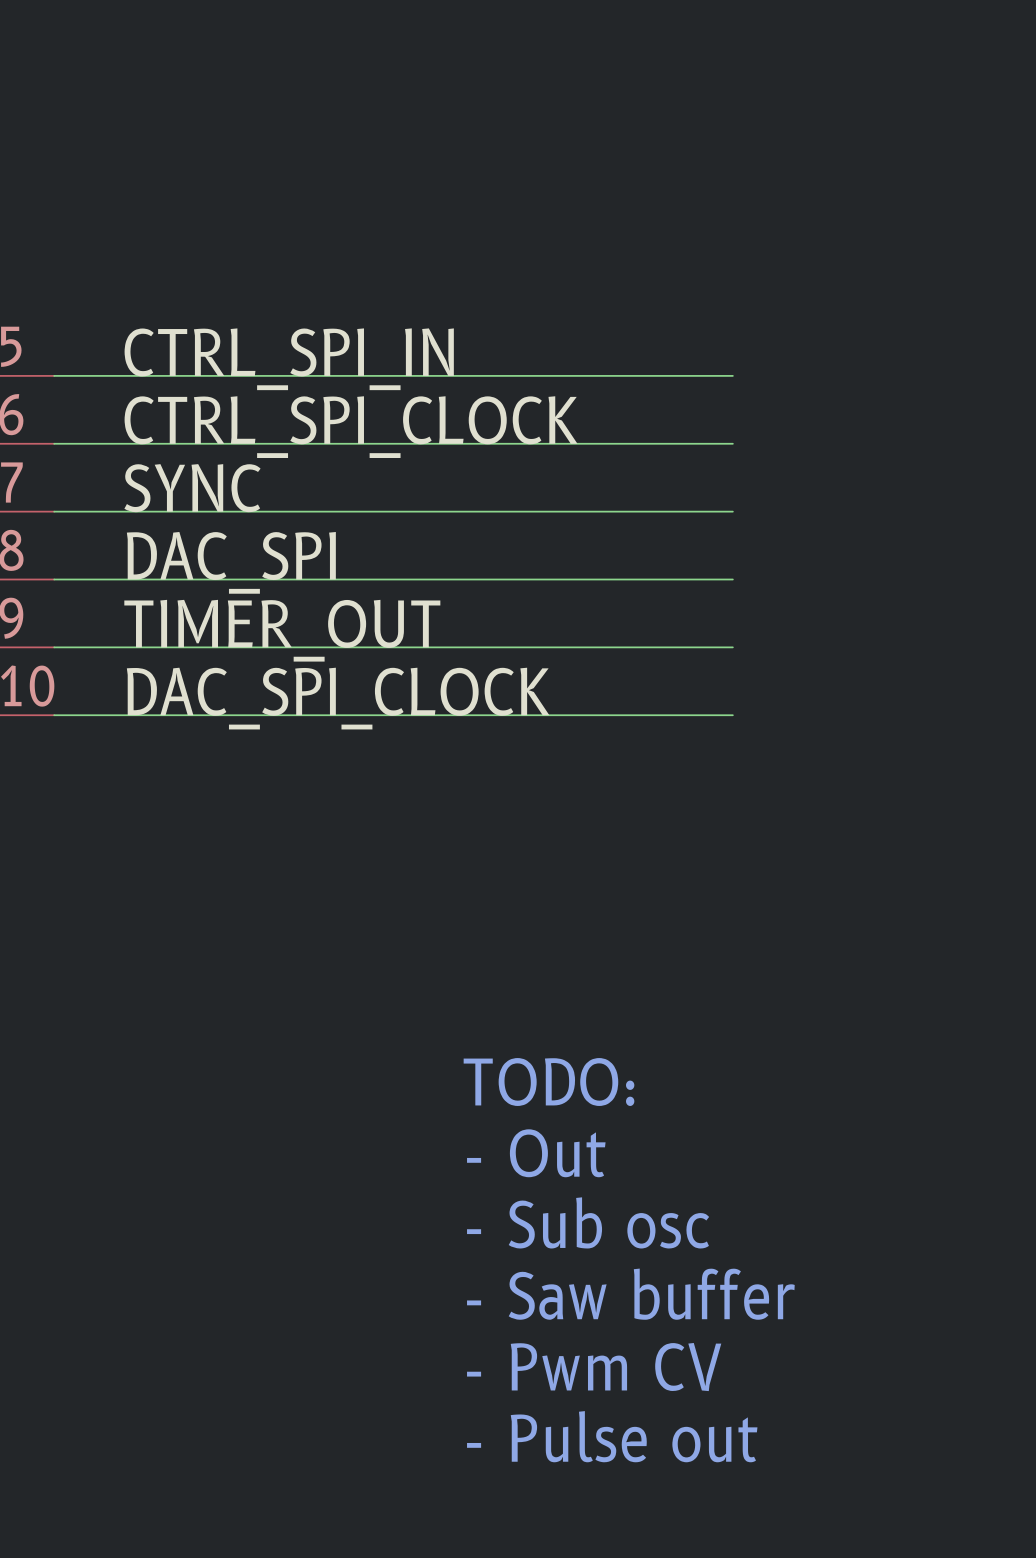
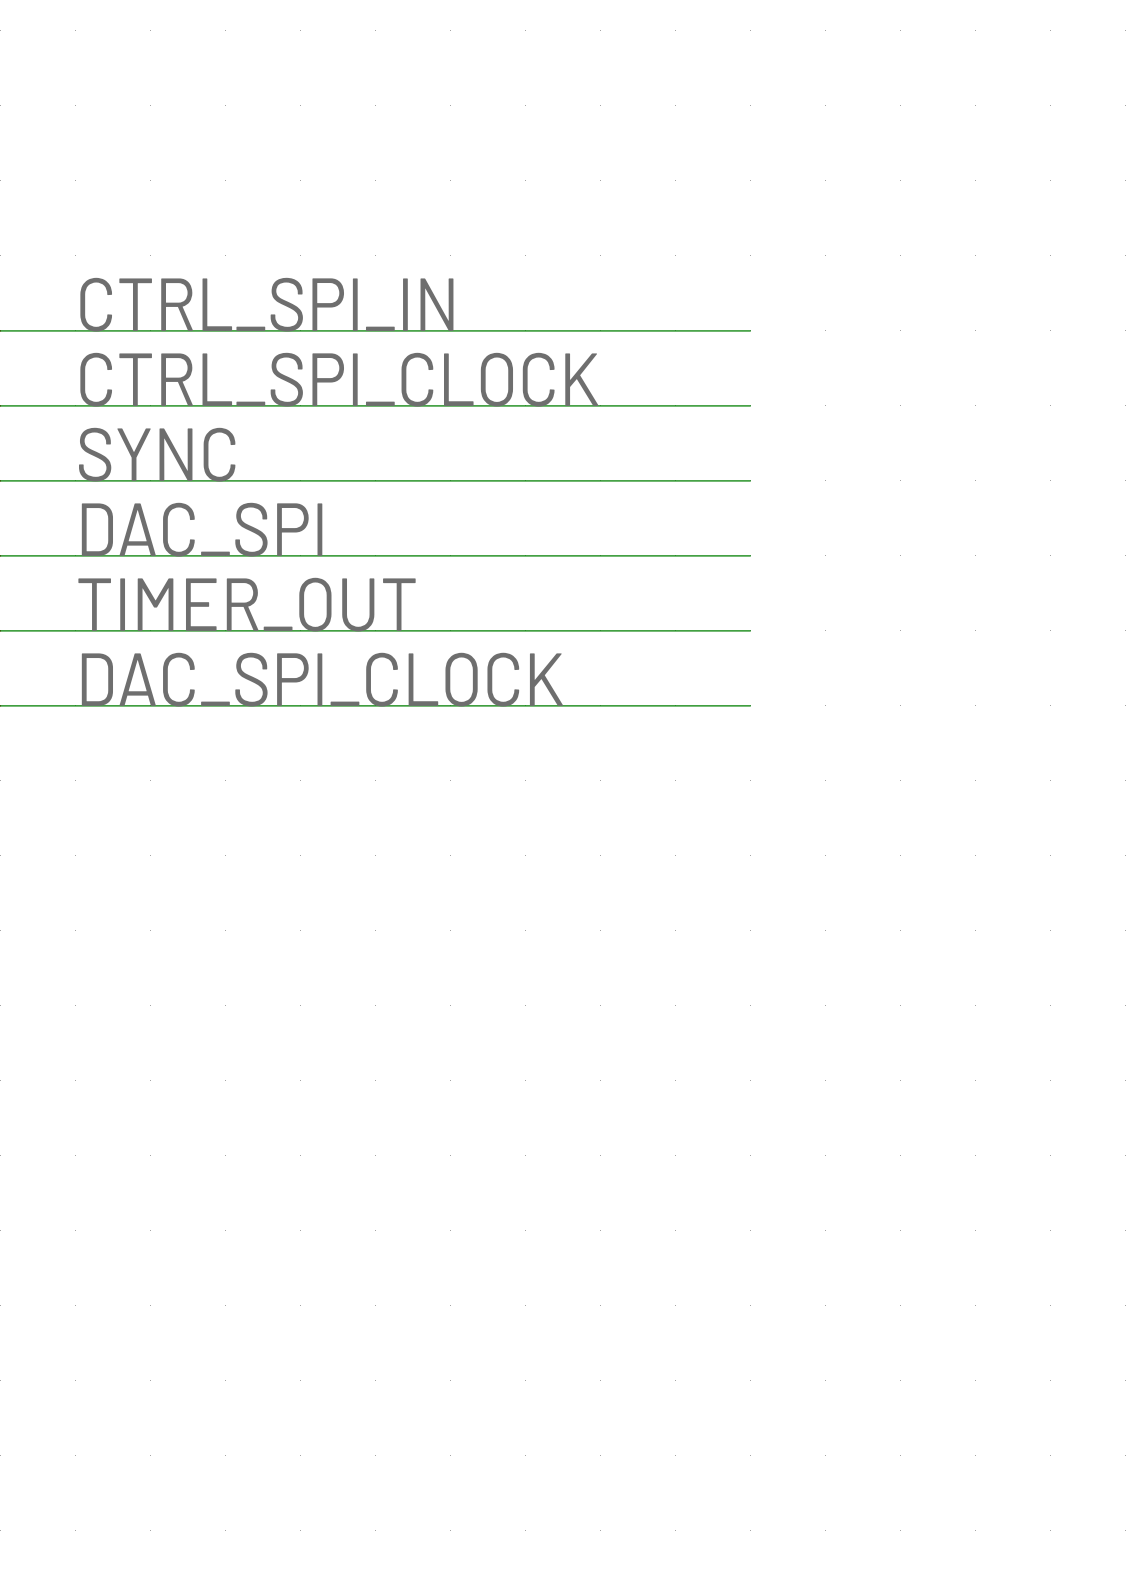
text: TODO: (548, 1082) -> none
text: - Out (536, 1153) -> none
text: - Sub osc (588, 1222) -> none
text: - Saw buffer (630, 1294) -> none
text: - Pwm CV (594, 1367) -> none
text: - Pulse out (612, 1436) -> none

